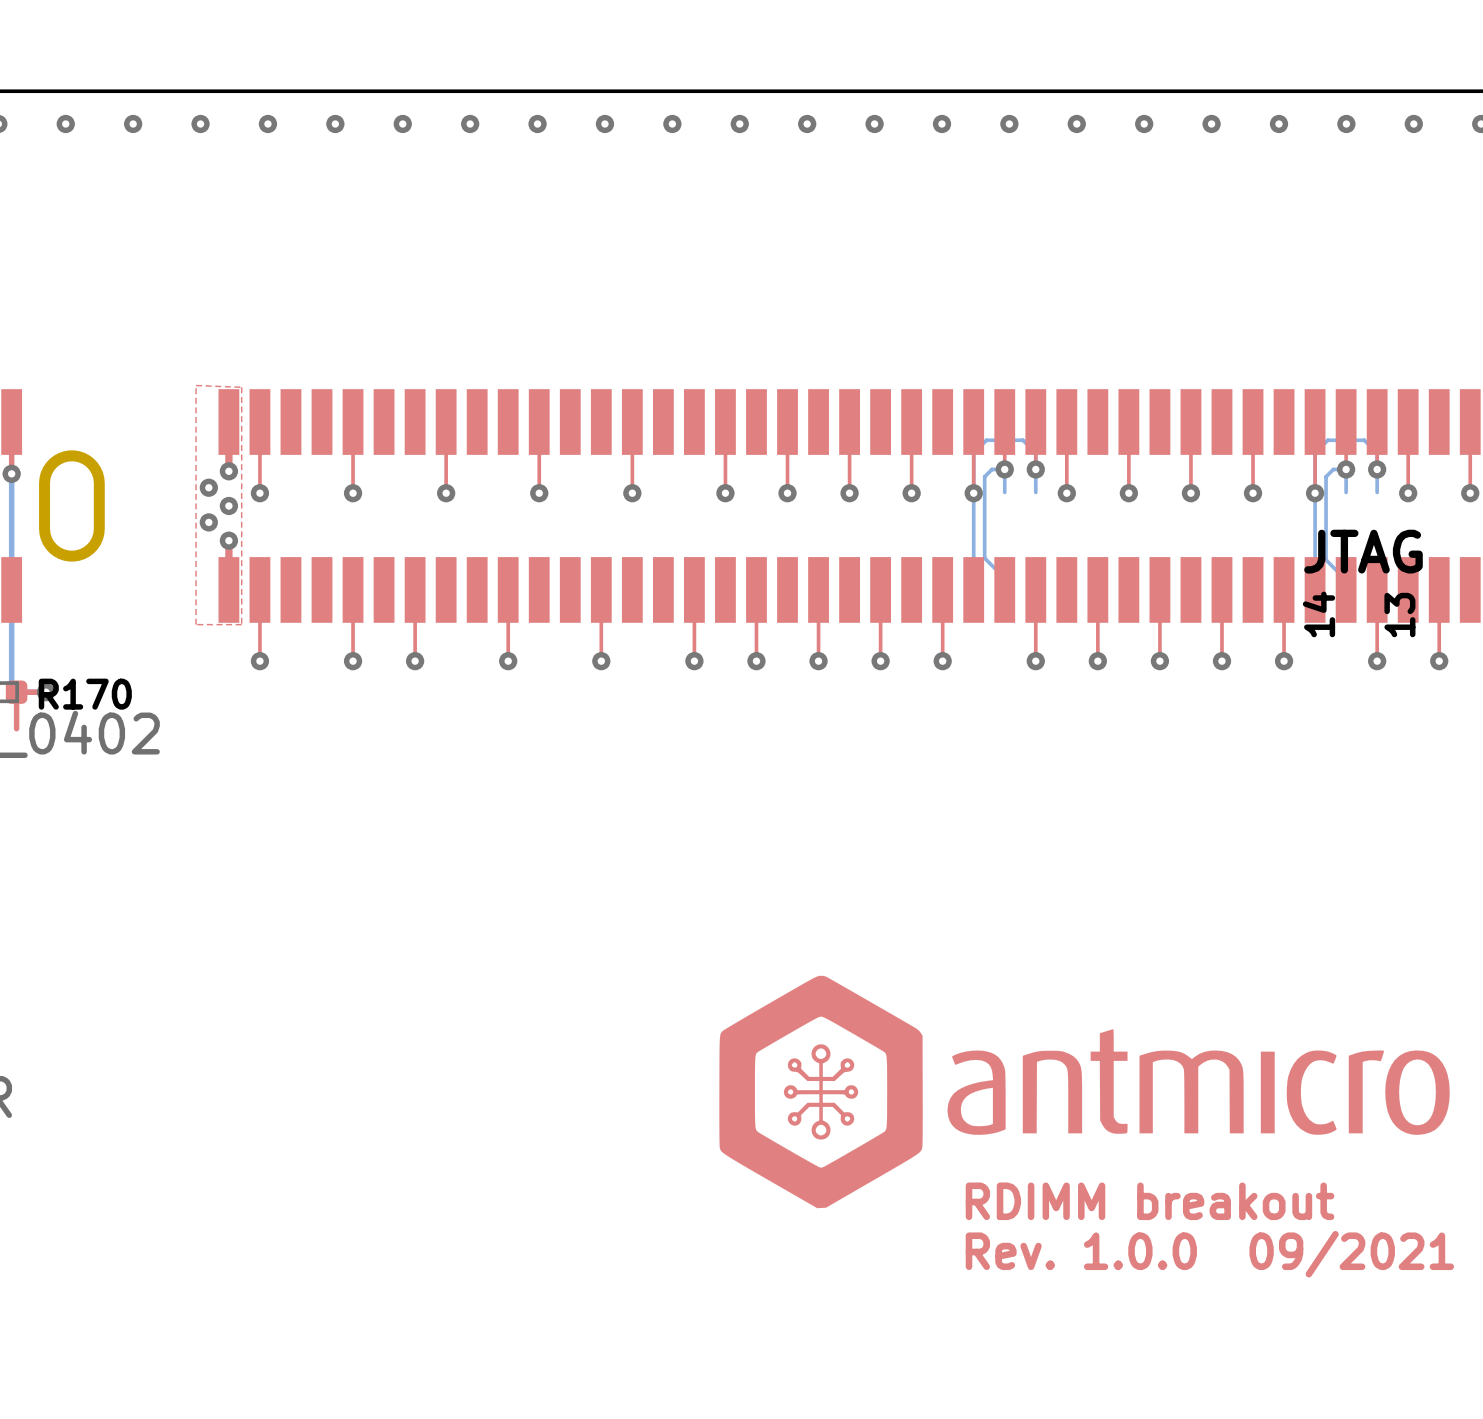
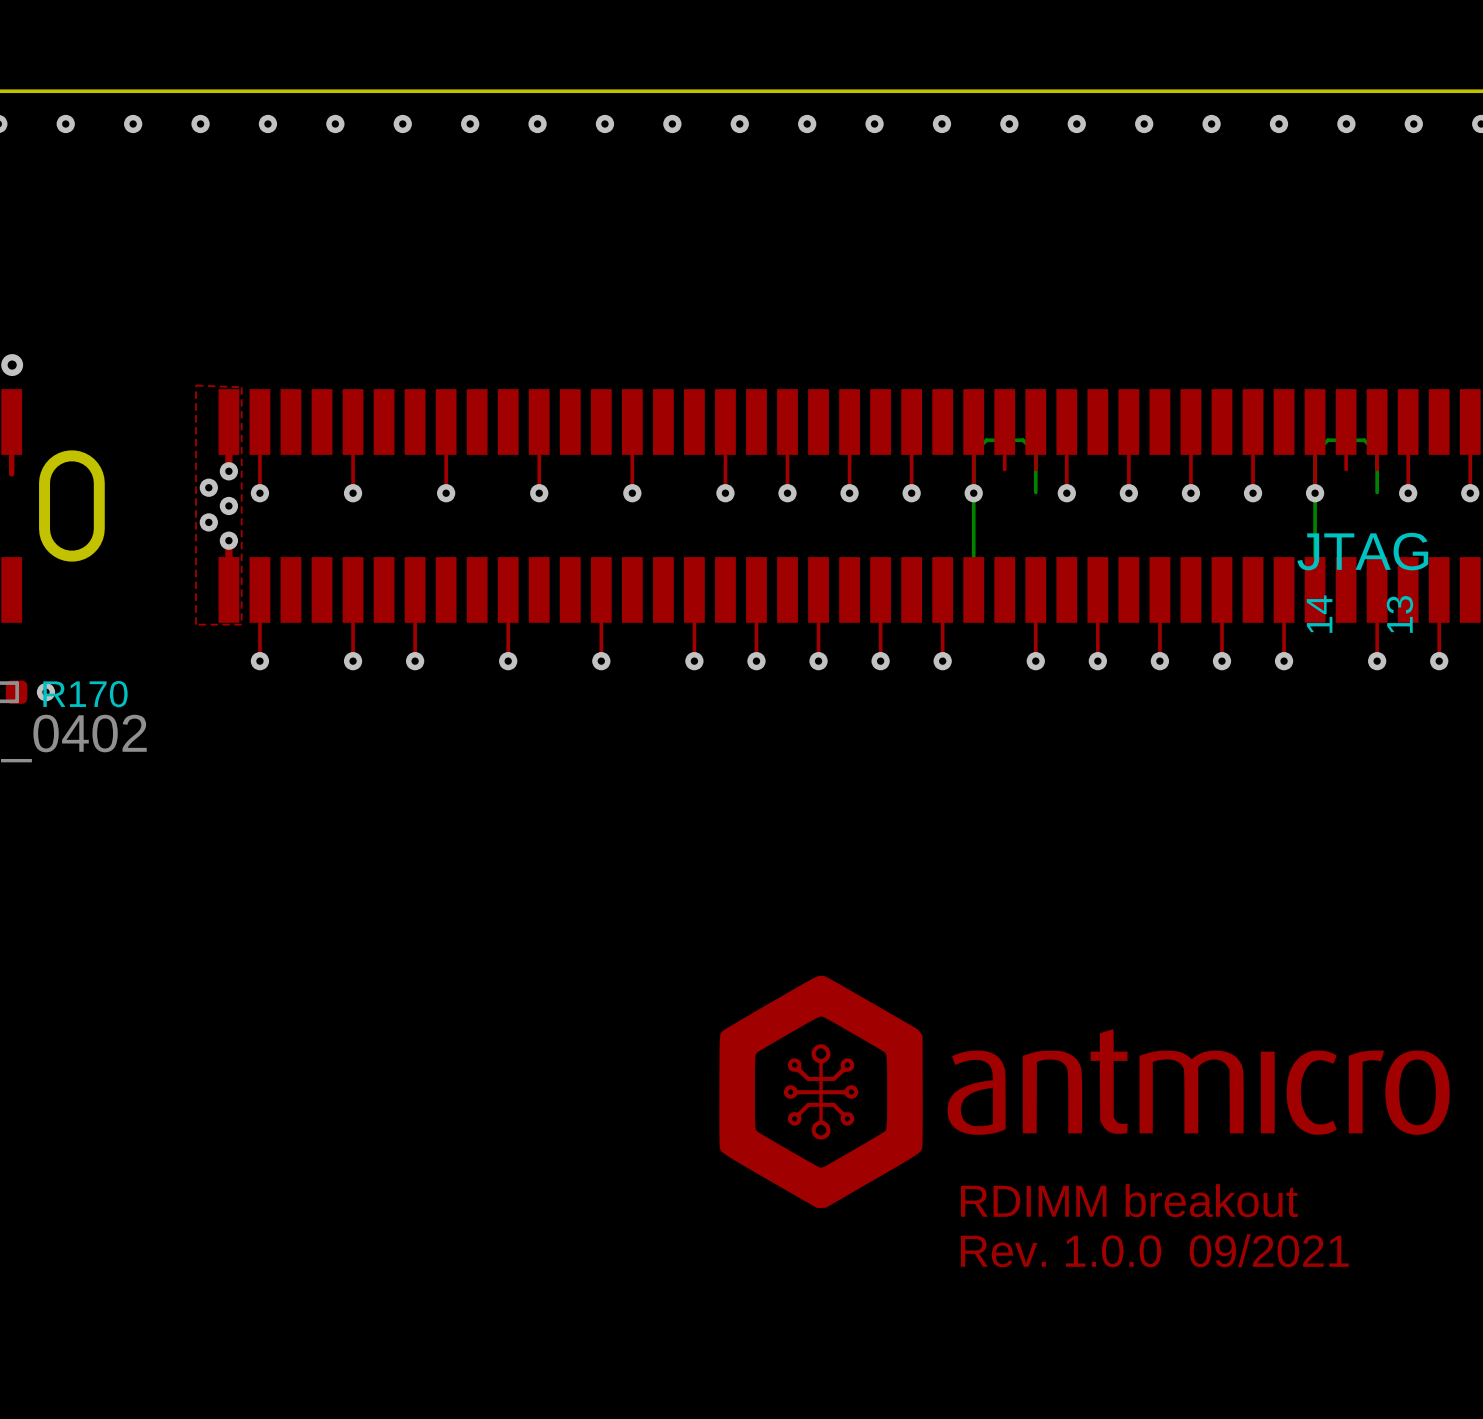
via: none -> (12, 365)
via: (1004, 469) -> none
via: (1035, 469) -> none
via: (1346, 469) -> none
via: (1377, 469) -> none
bottom track: (11, 473) (11, 687) (16, 692) (45, 692) -> none
via: (11, 473) -> none
bottom track: (1004, 492) (1004, 469) (991, 469) (984, 476) (984, 558) (1004, 578) -> none
bottom track: (1346, 492) (1346, 469) (1333, 469) (1326, 476) (1326, 560) (1346, 580) -> none
top track: (45, 692) (16, 692) (16, 728) -> none

